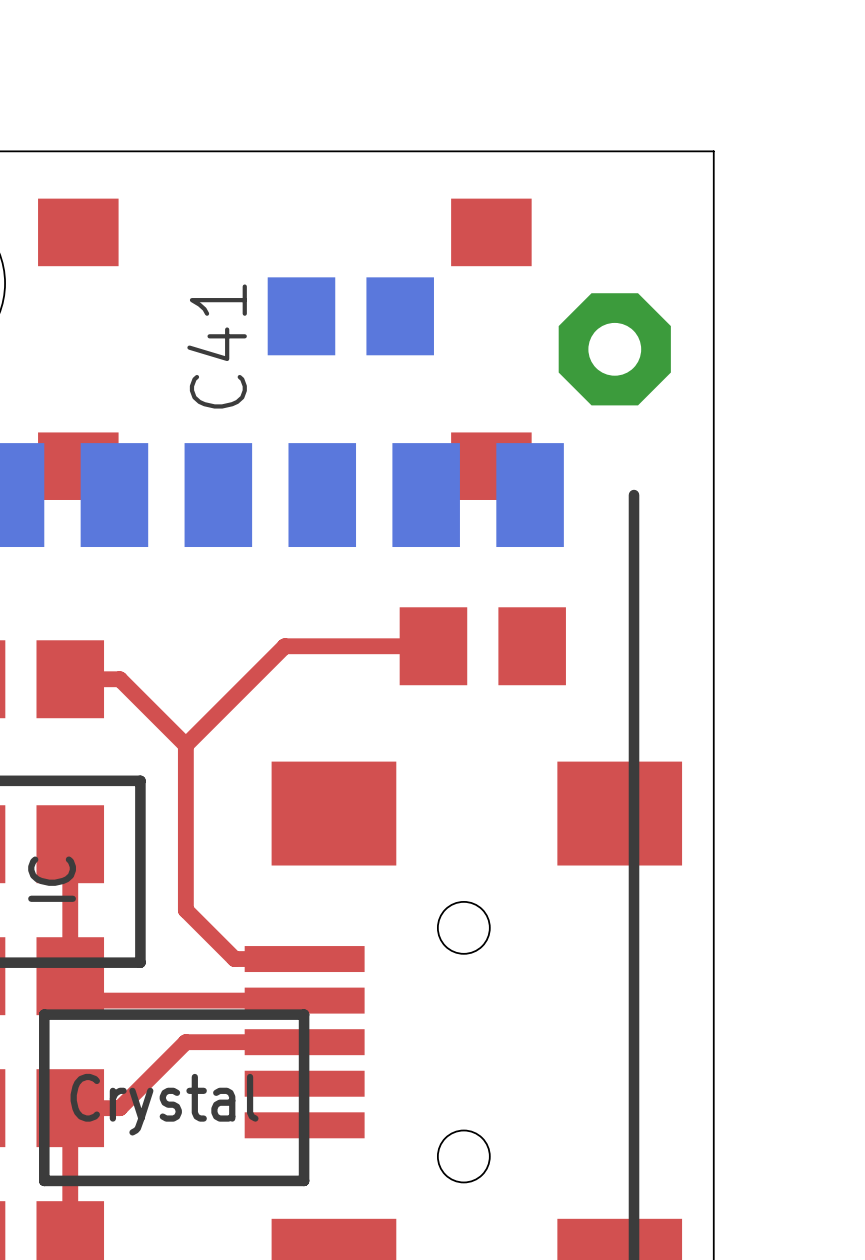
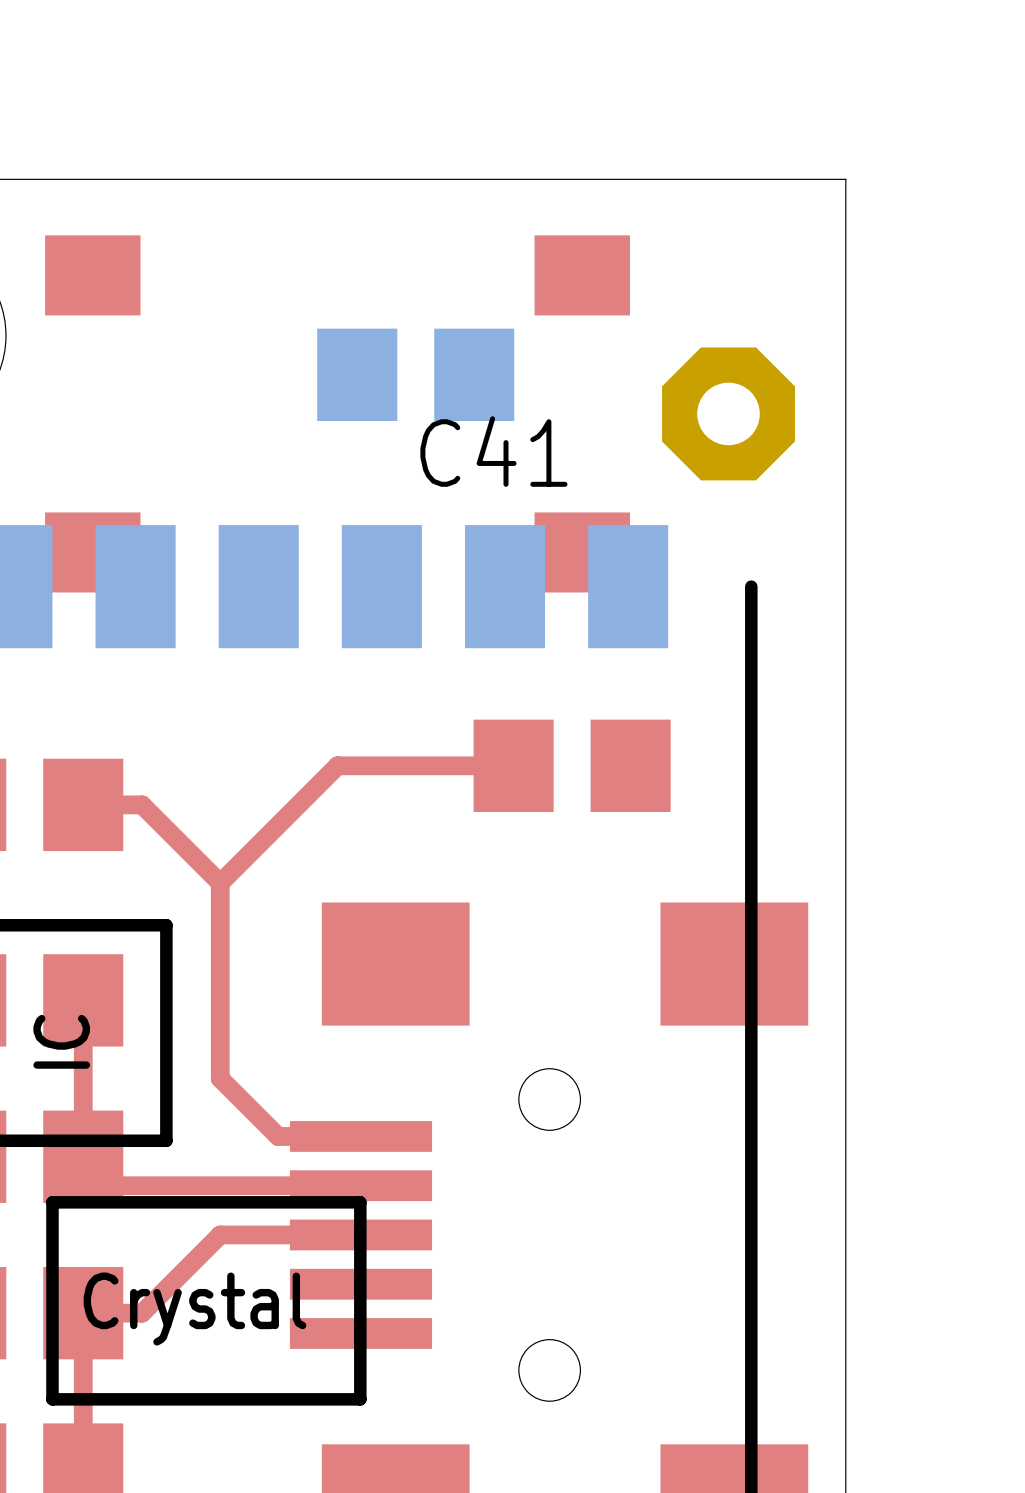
C41 name rotation: 0° (217, 346) -> 90° clockwise (493, 451)
C41 name position: C41 (217, 346) -> C41 (493, 451)

